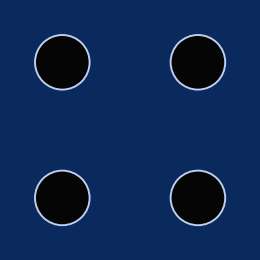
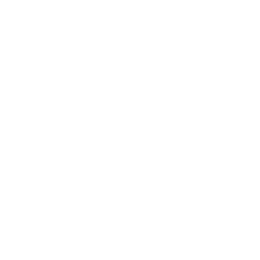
part: (62, 62) -> none
part: (197, 62) -> none
part: (62, 197) -> none
part: (197, 197) -> none

